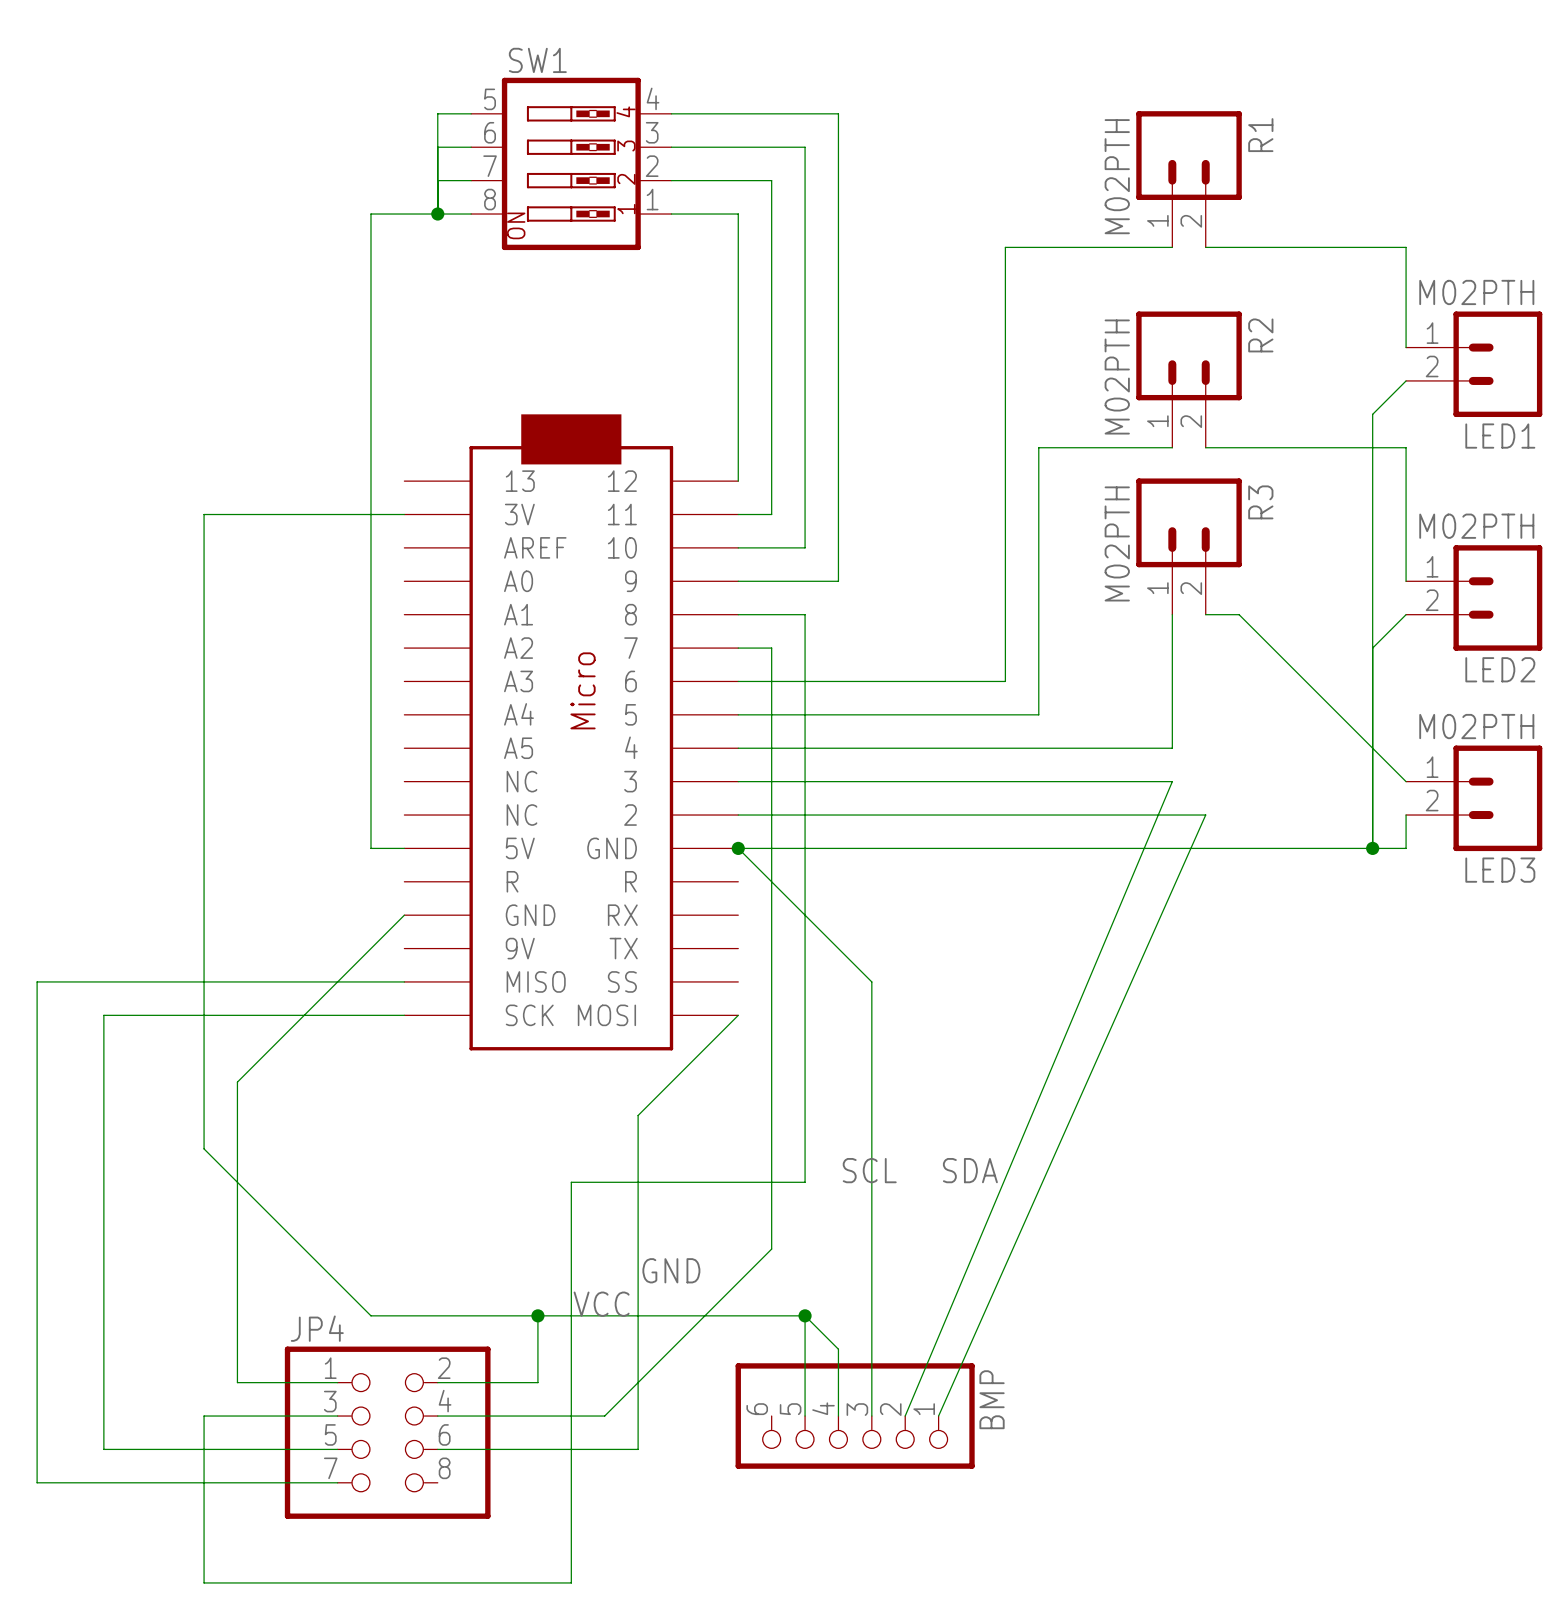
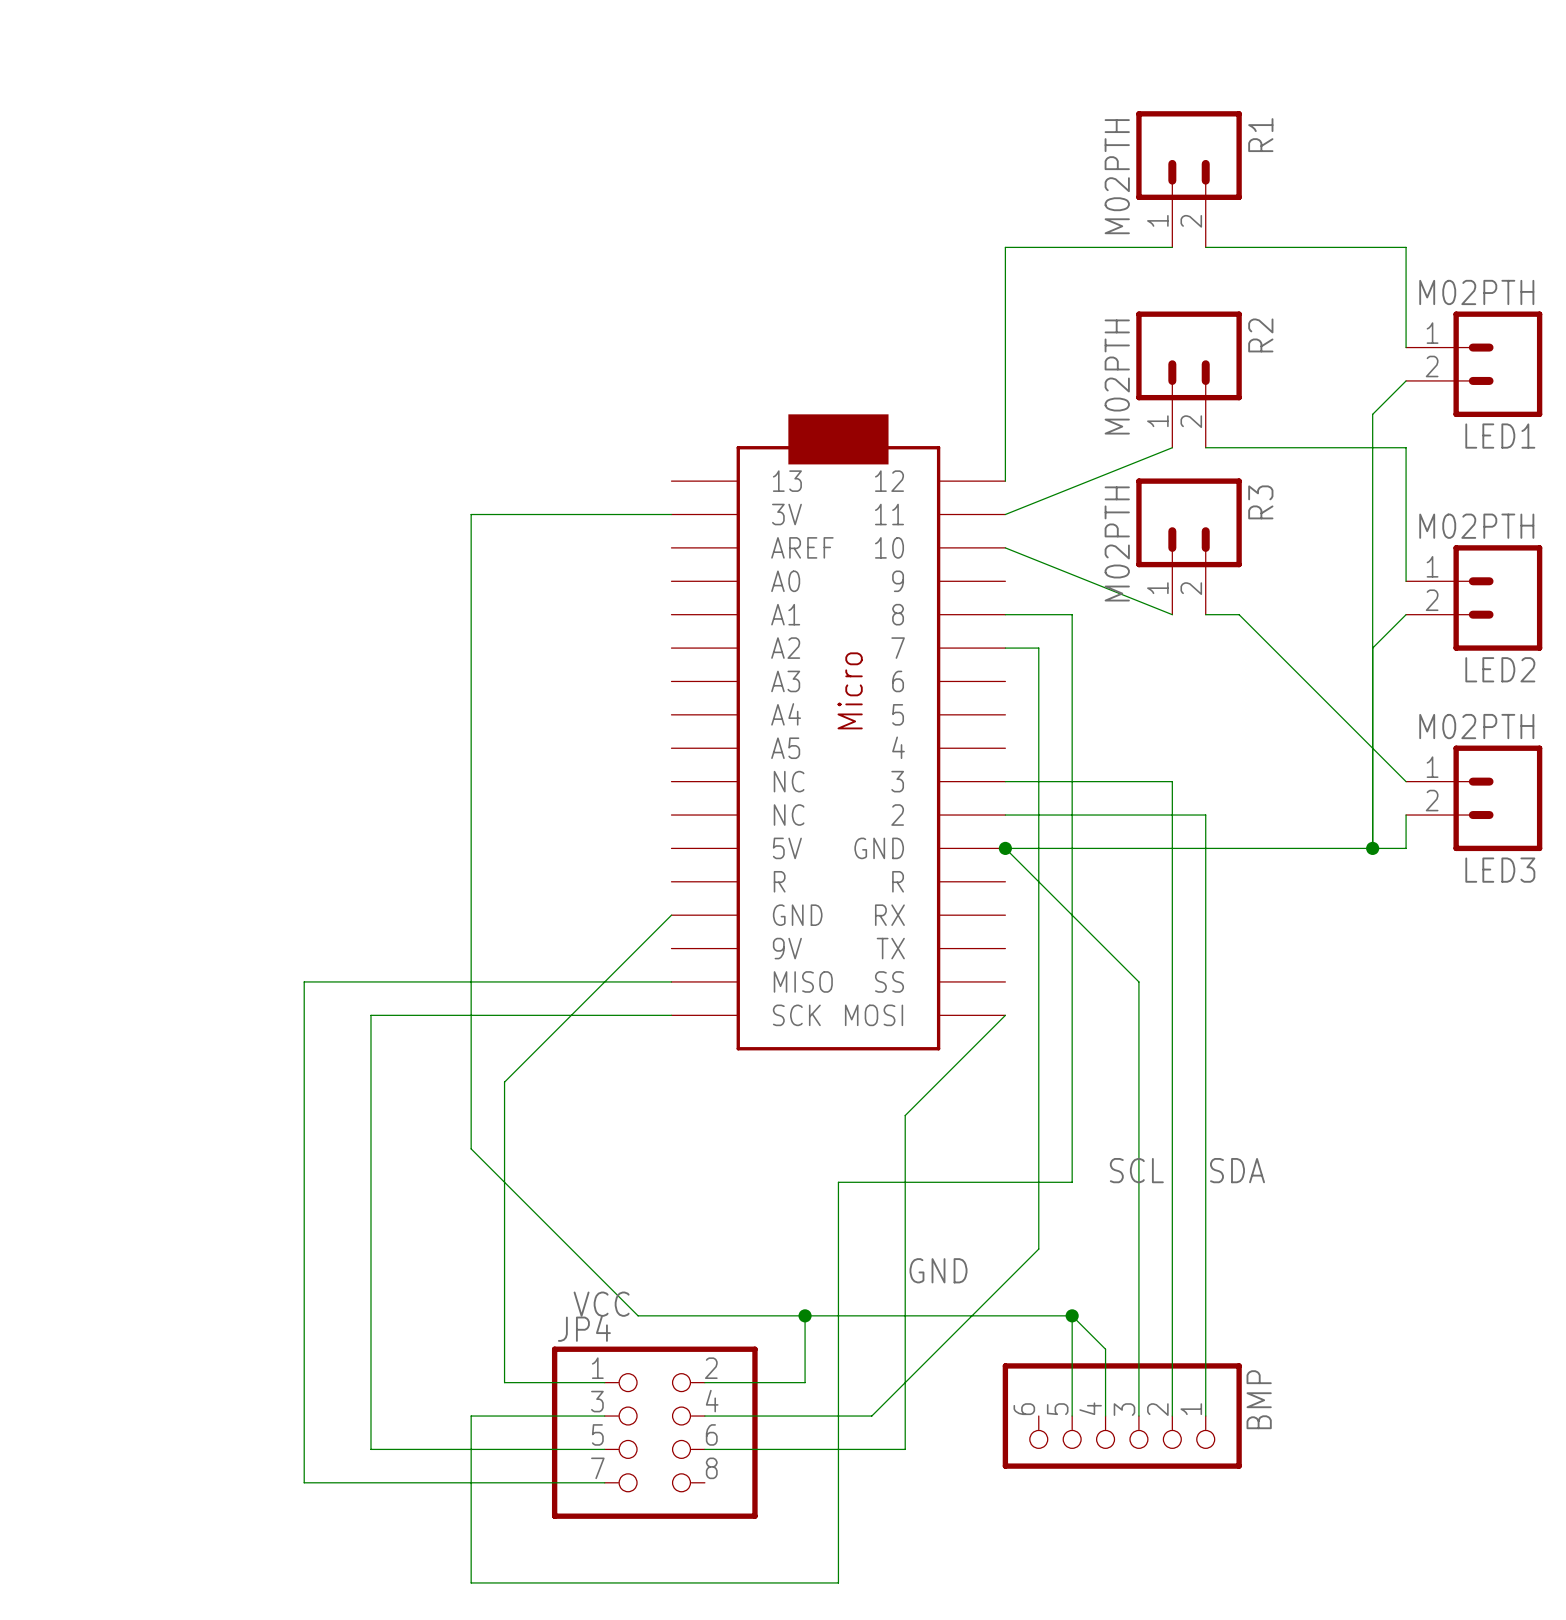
wire: (471, 113) (437, 113) (437, 214) -> none
wire: (671, 113) (838, 113) (838, 581) (738, 581) -> none
wire: (437, 147) (471, 147) -> none
wire: (671, 147) (805, 147) (805, 547) (738, 547) -> none
SW1: (571, 163) -> none
wire: (437, 180) (471, 180) -> none
wire: (671, 180) (771, 180) (771, 514) (738, 514) -> none
junction: (437, 214) -> none
wire: (471, 214) (370, 214) (370, 848) (404, 848) -> none
wire: (671, 214) (738, 214) (738, 481) -> none
wire: (1172, 447) (1038, 447) (1038, 648) -> (1172, 447) (1005, 514)
wire: (1005, 481) (1005, 681) (738, 681) -> none
wire: (404, 514) (204, 514) (204, 1148) (370, 1315) (638, 1315) -> (671, 514) (471, 514) (471, 1148) (638, 1315)
wire: (738, 614) (805, 614) (805, 1182) (571, 1182) (571, 1582) -> (838, 1416) (838, 1582) (571, 1582)
wire: none -> (1005, 614) (1072, 614) (1072, 1182) (838, 1182) (838, 1349)
wire: (1172, 614) (1172, 748) (738, 748) -> (1172, 614) (1005, 547)
wire: (738, 648) (771, 648) (771, 1249) (604, 1416) -> none
wire: none -> (1005, 648) (1038, 648)
wire: (738, 714) (1038, 714) -> (704, 1416) (871, 1416) (1038, 1249) (1038, 714)
part position: (571, 732) -> (838, 732)
wire: (738, 781) (1005, 781) -> none
wire: (1172, 781) (905, 1416) -> (1172, 781) (1172, 1416)
wire: (738, 815) (1005, 815) -> none
wire: (1205, 815) (938, 1416) -> (1205, 815) (1205, 1416)
junction: (738, 848) -> none
wire: (1005, 848) (738, 848) (871, 981) (871, 1416) -> (1005, 848) (1138, 981) (1138, 1416)
junction: none -> (1005, 848)
wire: (404, 915) (237, 1082) (237, 1382) (337, 1382) -> none
wire: (304, 981) (37, 981) (37, 1482) (304, 1482) -> (304, 981) (304, 1482)
wire: none -> (404, 981) (671, 981)
wire: (370, 1015) (103, 1015) (103, 1449) (337, 1449) -> (370, 1015) (370, 1449) (437, 1449)
wire: none -> (404, 1015) (671, 1015)
wire: (738, 1015) (638, 1115) (638, 1449) (604, 1449) -> none
wire: none -> (1005, 1015) (905, 1115) (905, 1449) (704, 1449)
label position: SCL (869, 1170) -> SCL (1136, 1170)
label position: SDA (970, 1170) -> SDA (1237, 1170)
label position: GND (671, 1270) -> GND (938, 1270)
wire: (537, 1315) (537, 1382) -> (604, 1382) (537, 1382)
junction: (537, 1315) -> none
wire: (805, 1315) (838, 1349) -> (805, 1315) (1072, 1315)
wire: none -> (1072, 1315) (1072, 1416)
wire: none -> (1072, 1315) (1105, 1349) (1105, 1416)
junction: none -> (1072, 1315)
wire: (437, 1382) (504, 1382) -> (671, 915) (504, 1082) (504, 1382)
wire: (805, 1382) (805, 1416) -> (805, 1382) (704, 1382)
wire: (337, 1416) (204, 1416) (204, 1582) (471, 1582) -> (471, 1416) (471, 1582)
wire: (437, 1416) (471, 1416) -> none
BMP position: (855, 1416) -> (1122, 1416)
JP4 position: (387, 1432) -> (654, 1432)
wire: none -> (337, 1482) (604, 1482)

